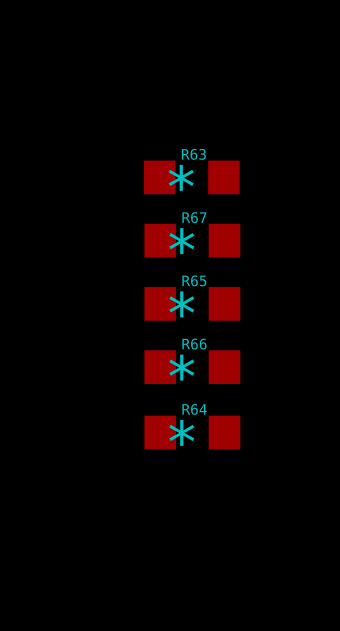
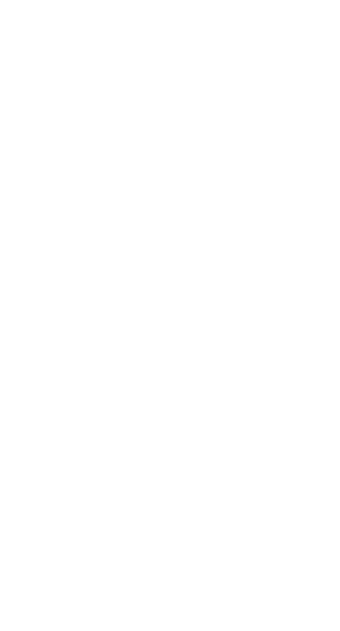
R63: (191, 177) -> none
R67: (192, 240) -> none
R65: (192, 303) -> none
R66: (192, 367) -> none
R64: (192, 432) -> none

